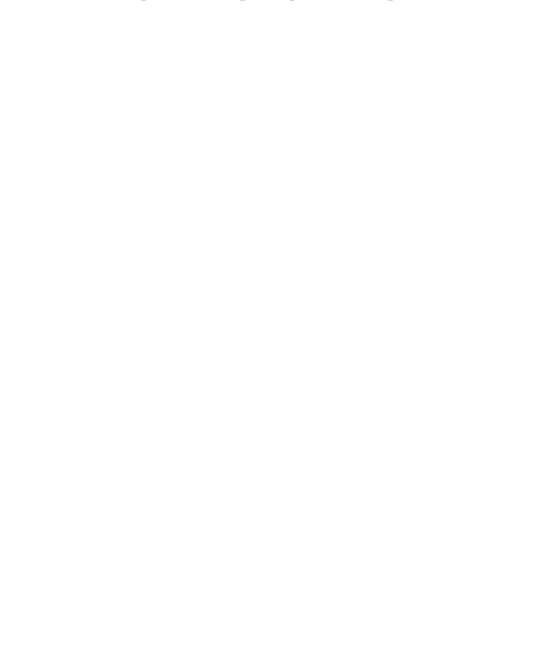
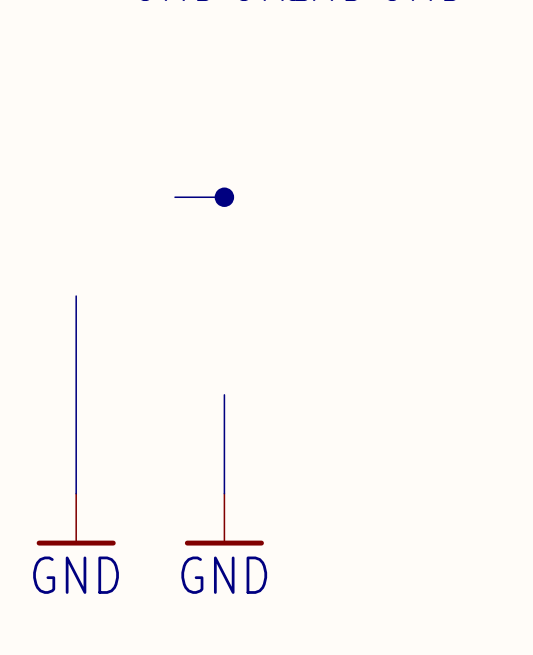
wire: none -> (174, 197) (224, 197)
junction: none -> (224, 197)
wire: none -> (76, 296) (76, 493)
wire: none -> (224, 394) (224, 493)
power symbol: none -> GND (76, 519)
power symbol: none -> GND (224, 519)

